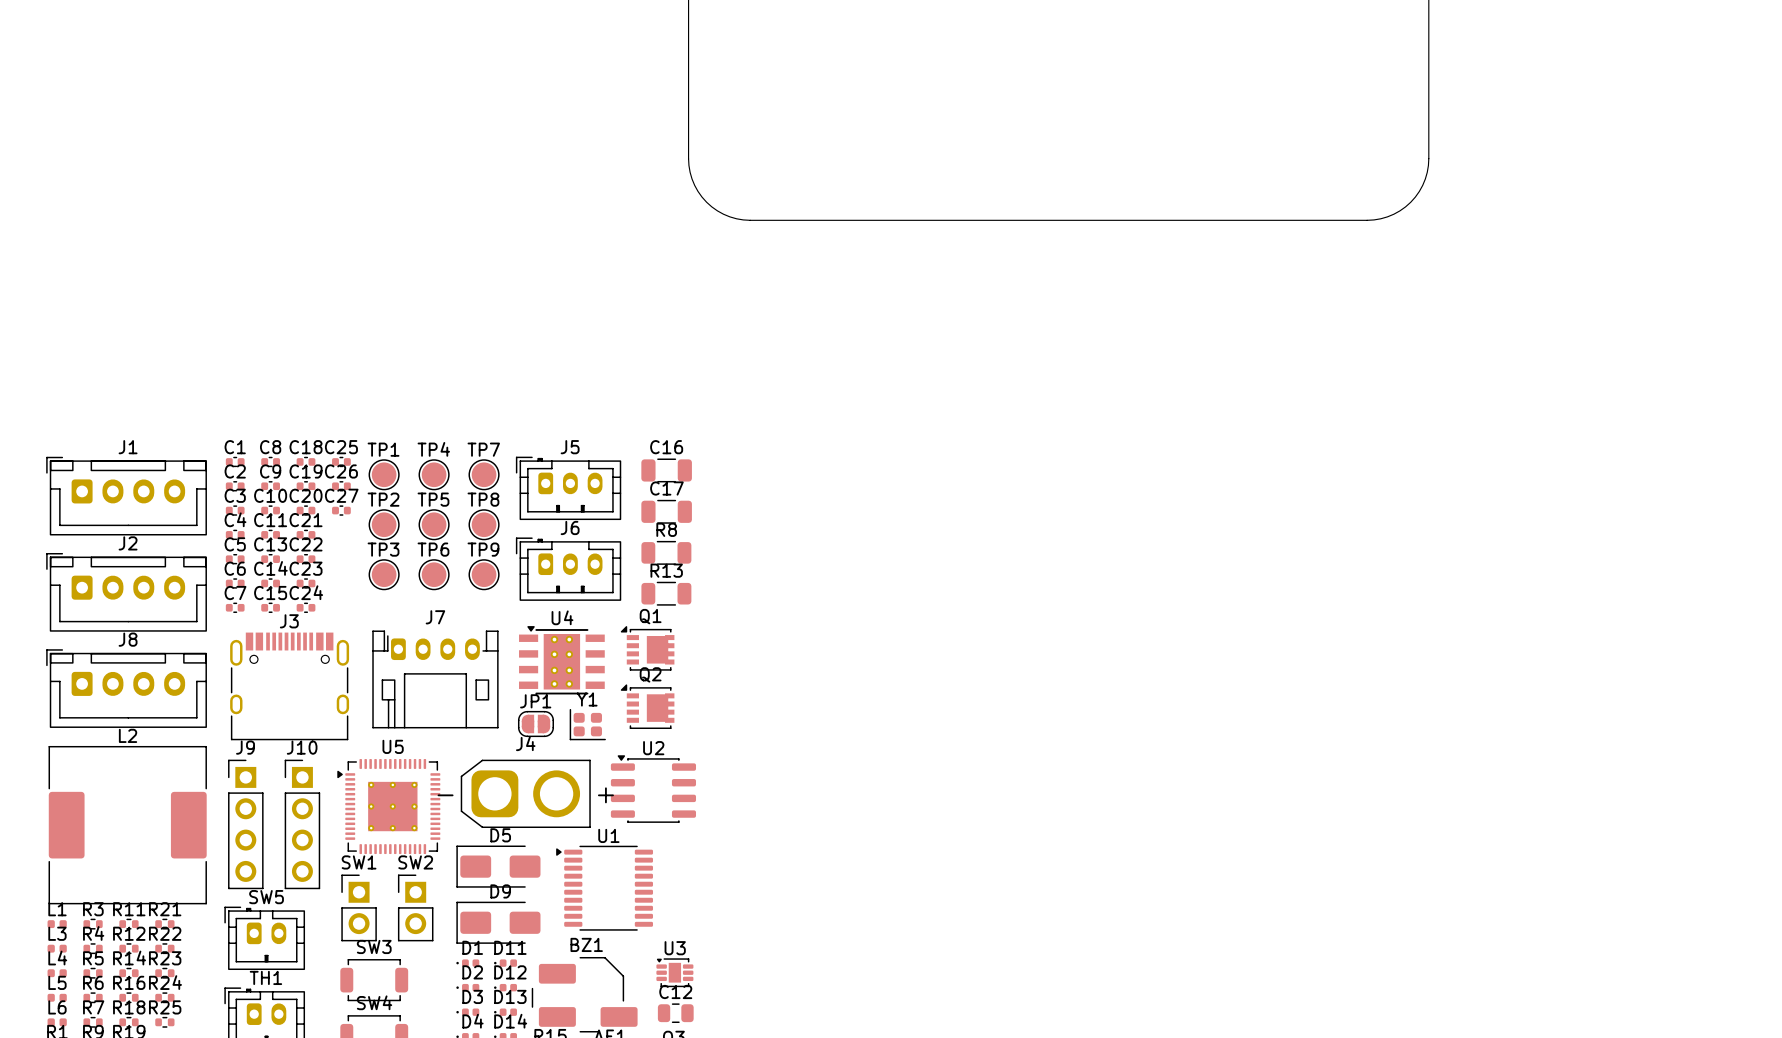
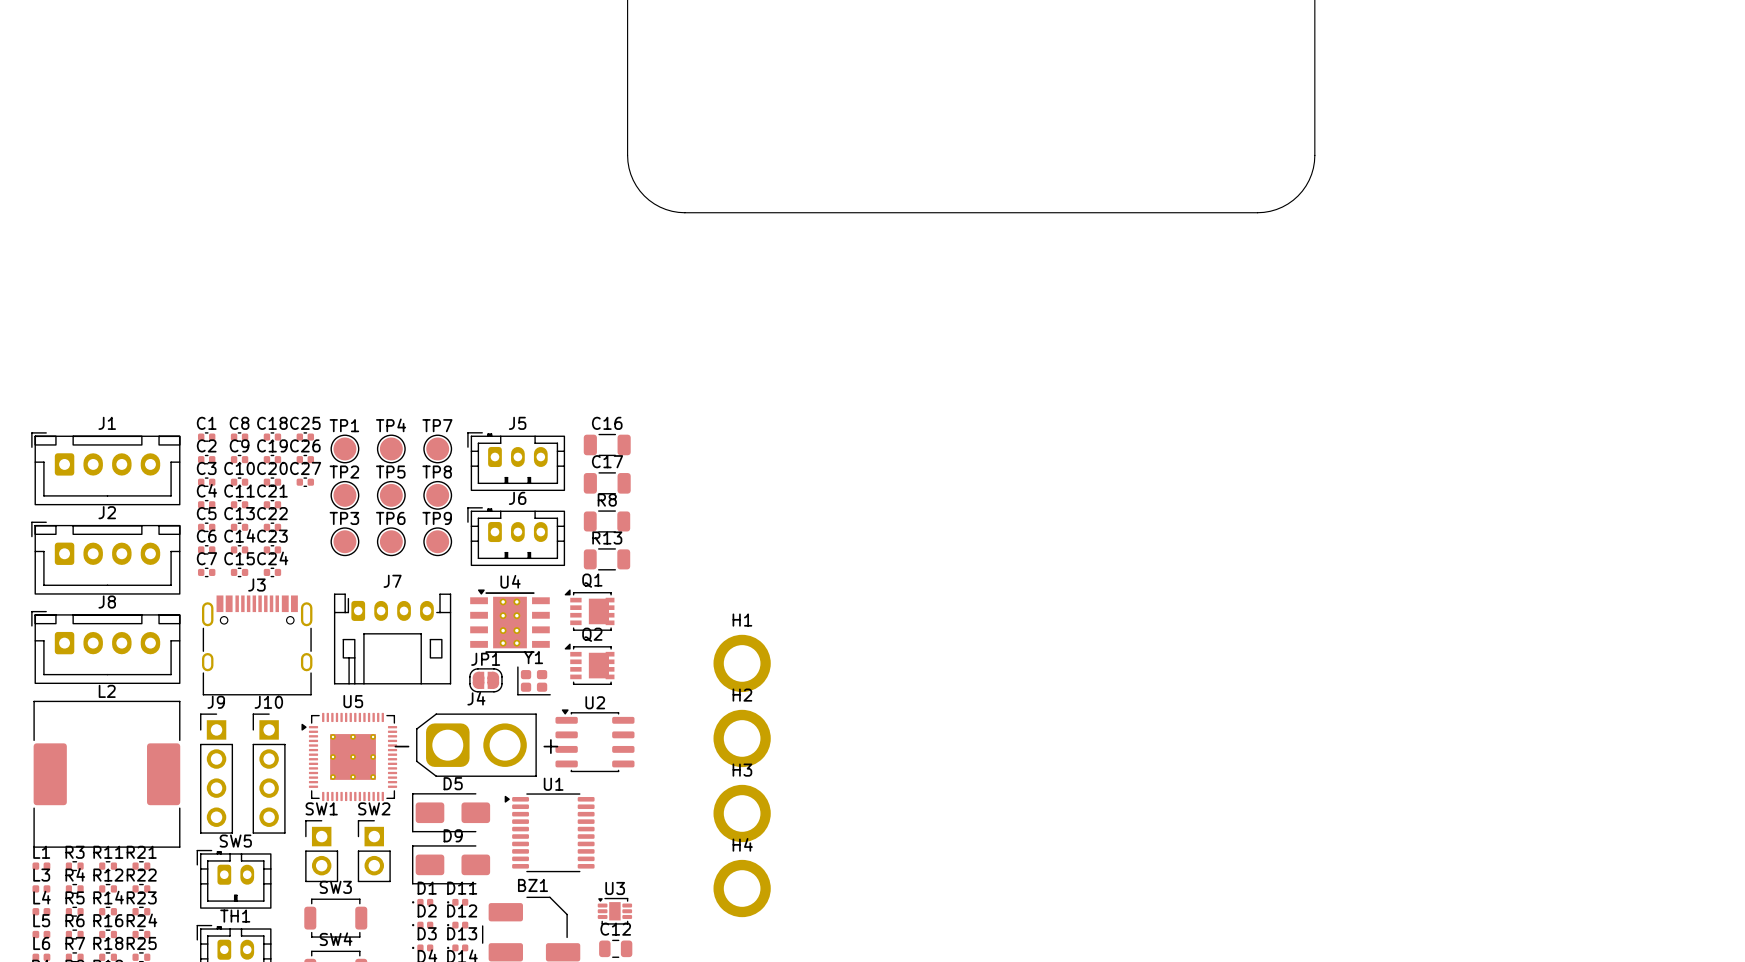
H1: none -> (742, 663)
H2: none -> (742, 738)
H3: none -> (742, 813)
H4: none -> (742, 888)

